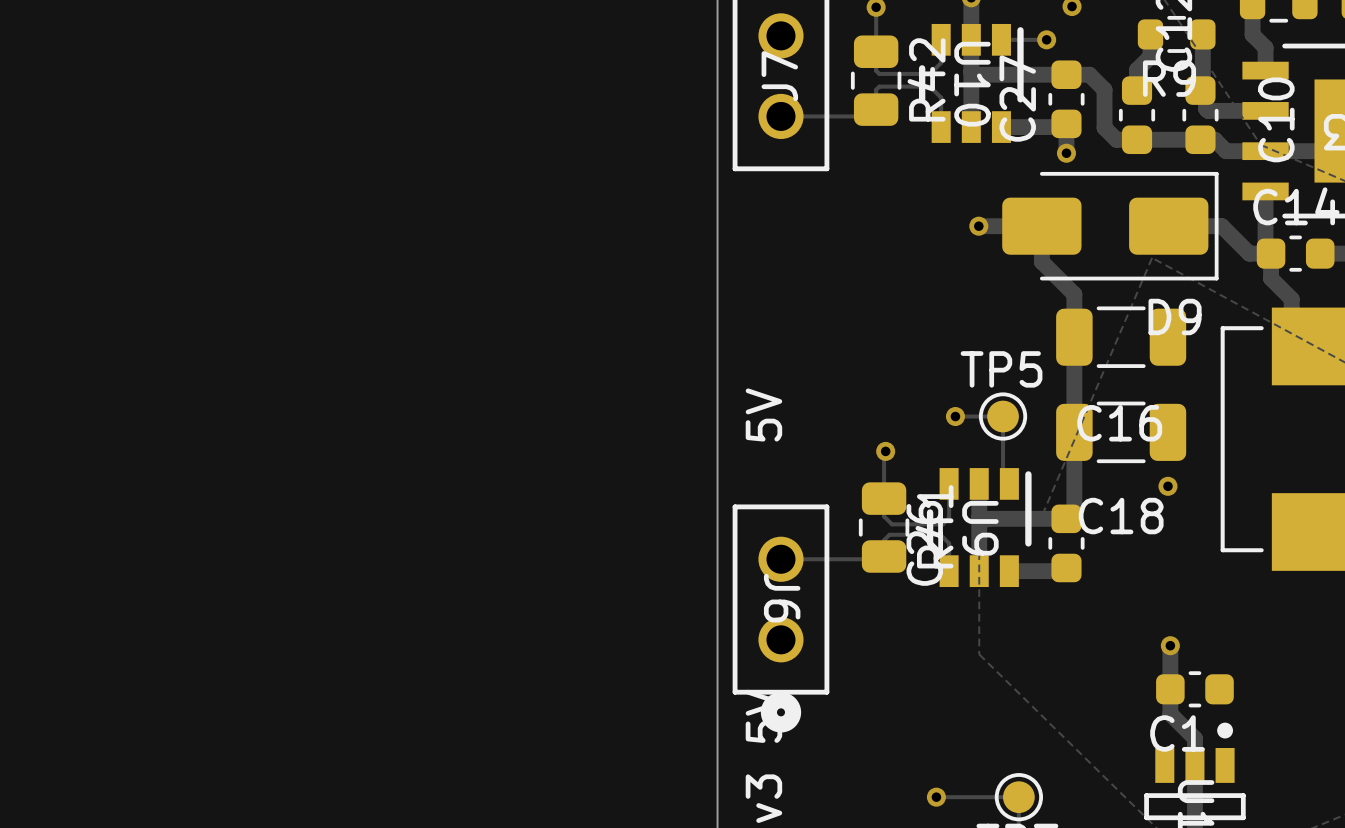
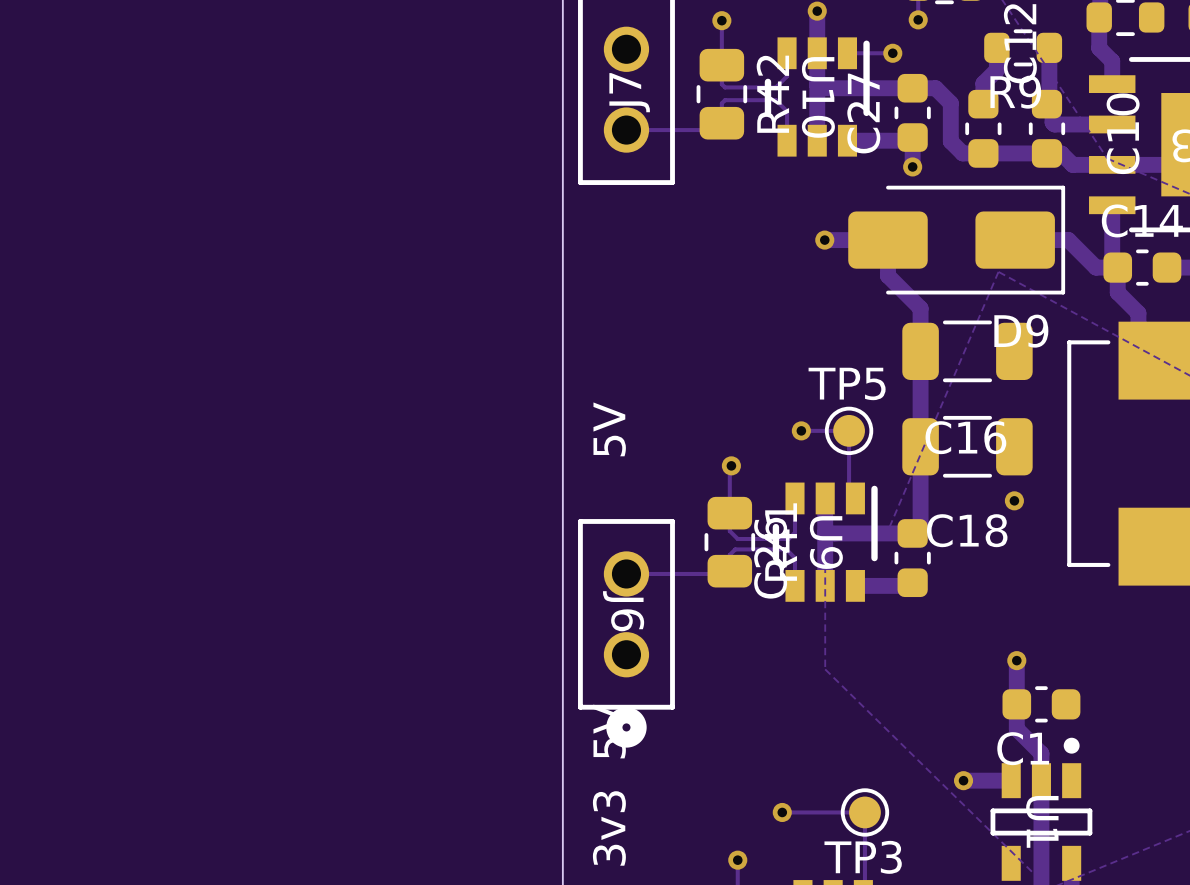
track: none -> (963, 780) (1011, 780)
via: none -> (963, 780)

